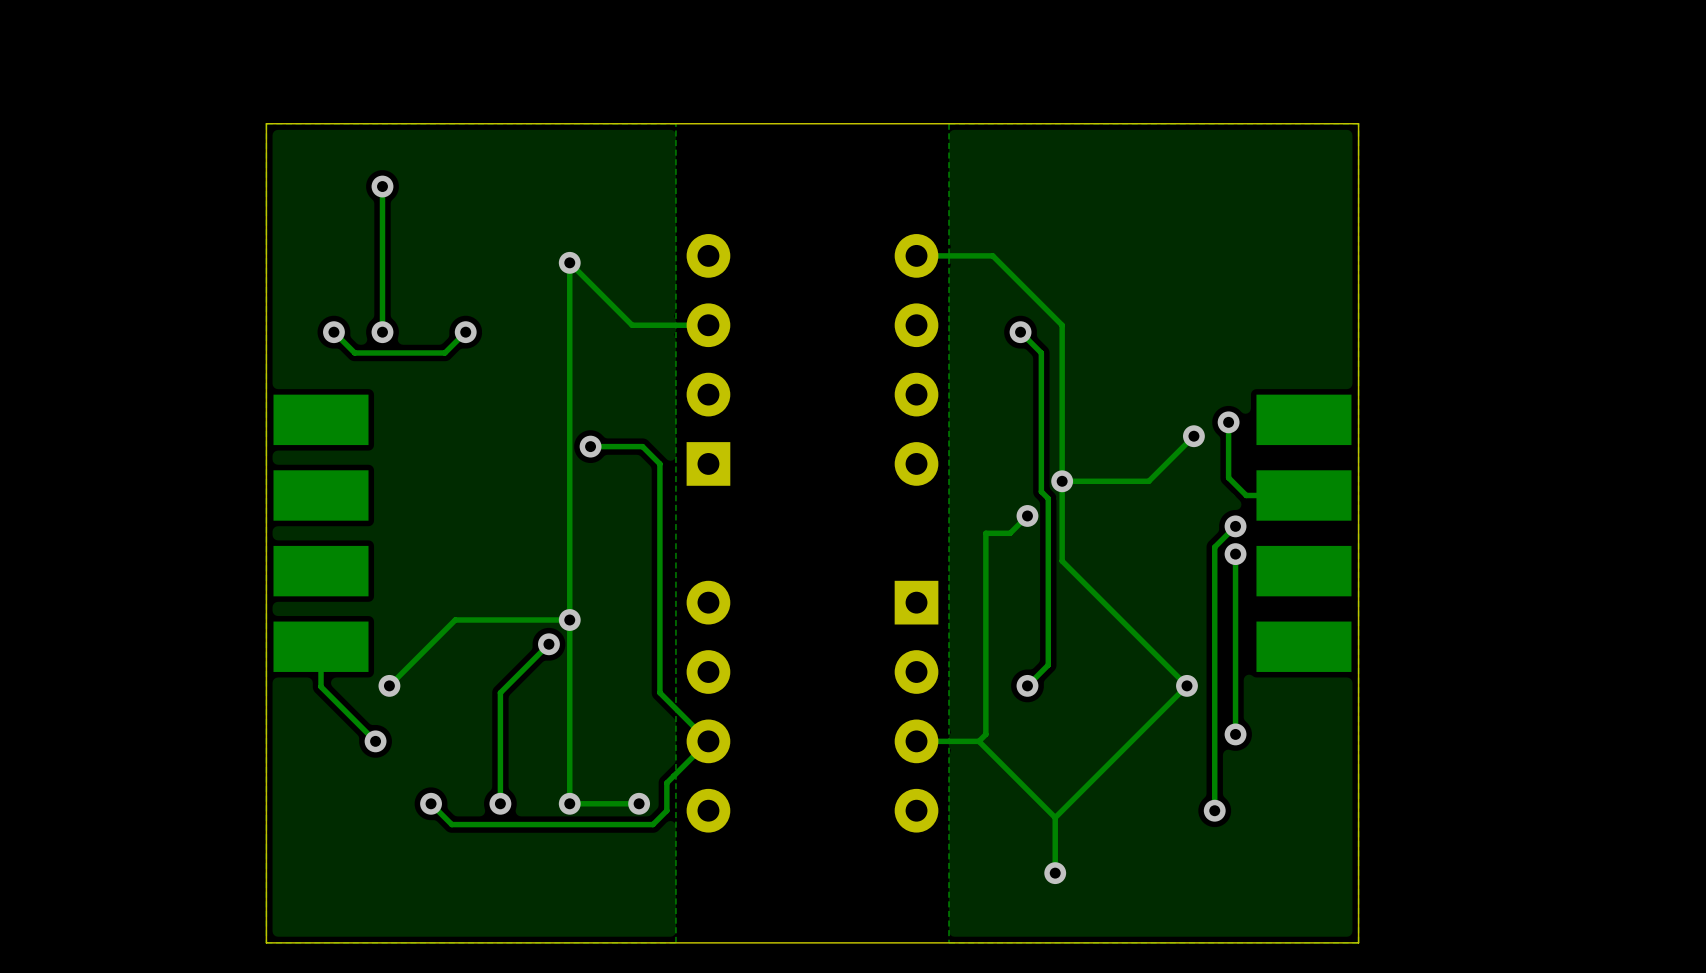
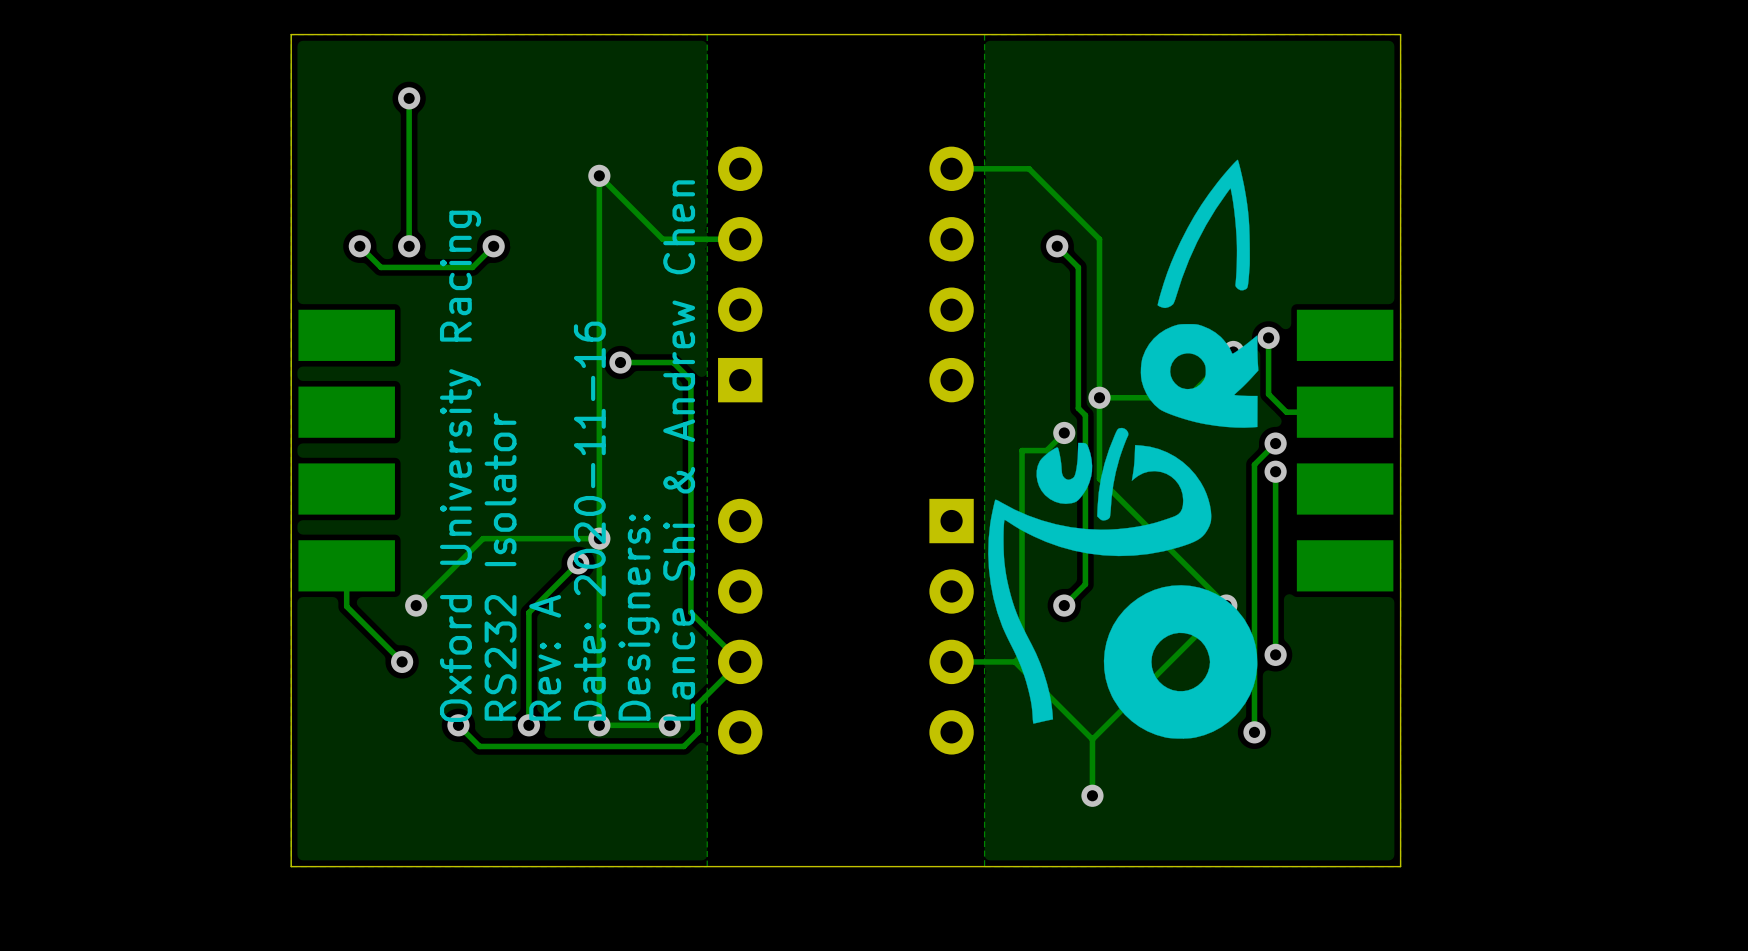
drawing: none -> [988, 159, 1259, 739]
text: none -> Lance Shi & Andrew Chen (679, 450)
text: none -> Oxford University Racing (460, 466)
text: none -> Date: 2020-11-16 (589, 521)
text: none -> RS232 Isolator (500, 566)
text: none -> Designers: (639, 617)
text: none -> Rev: A (545, 657)

